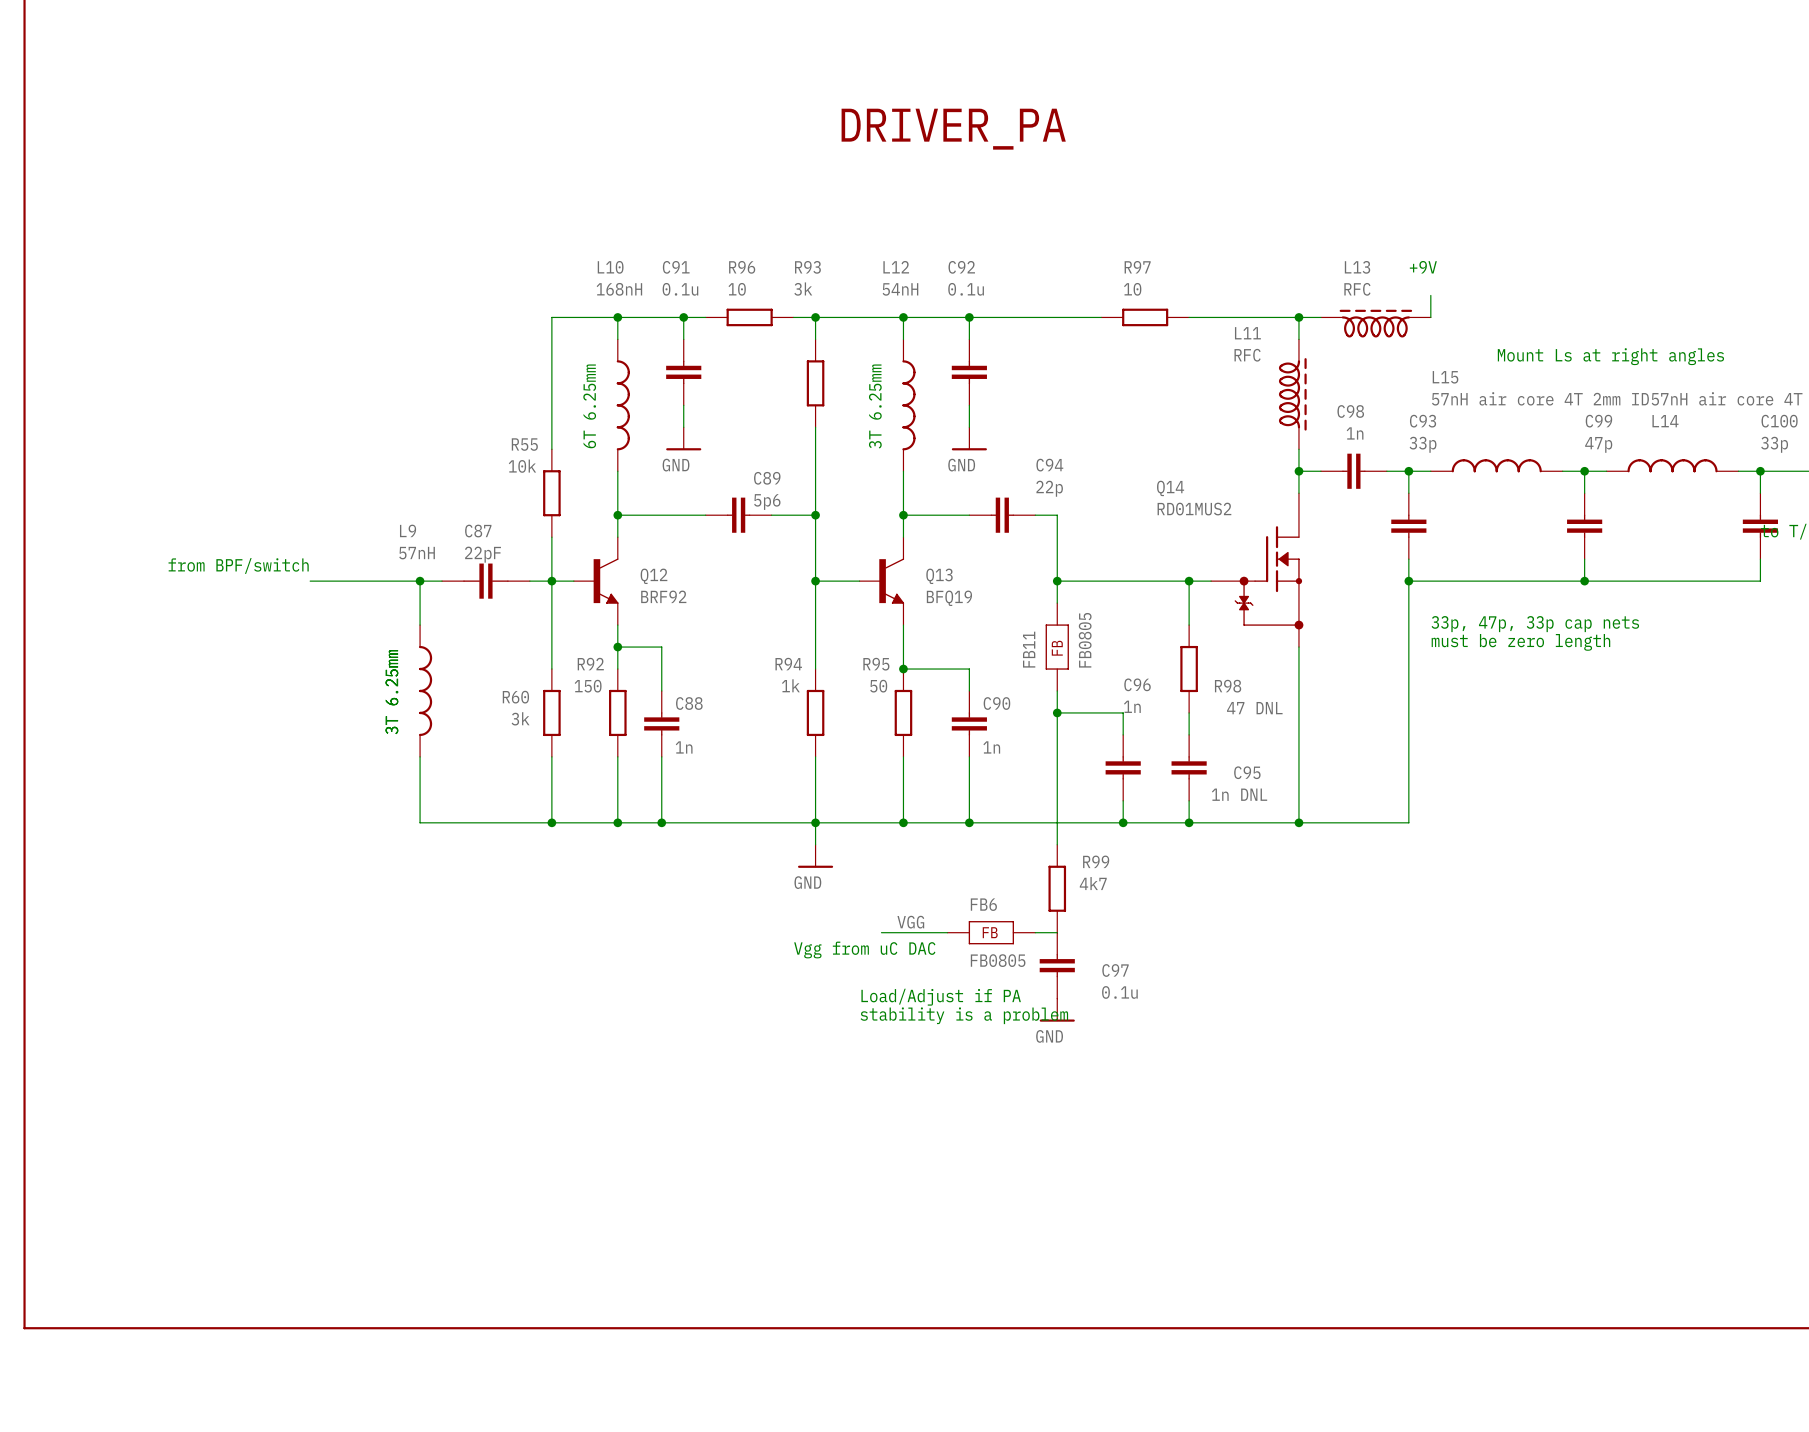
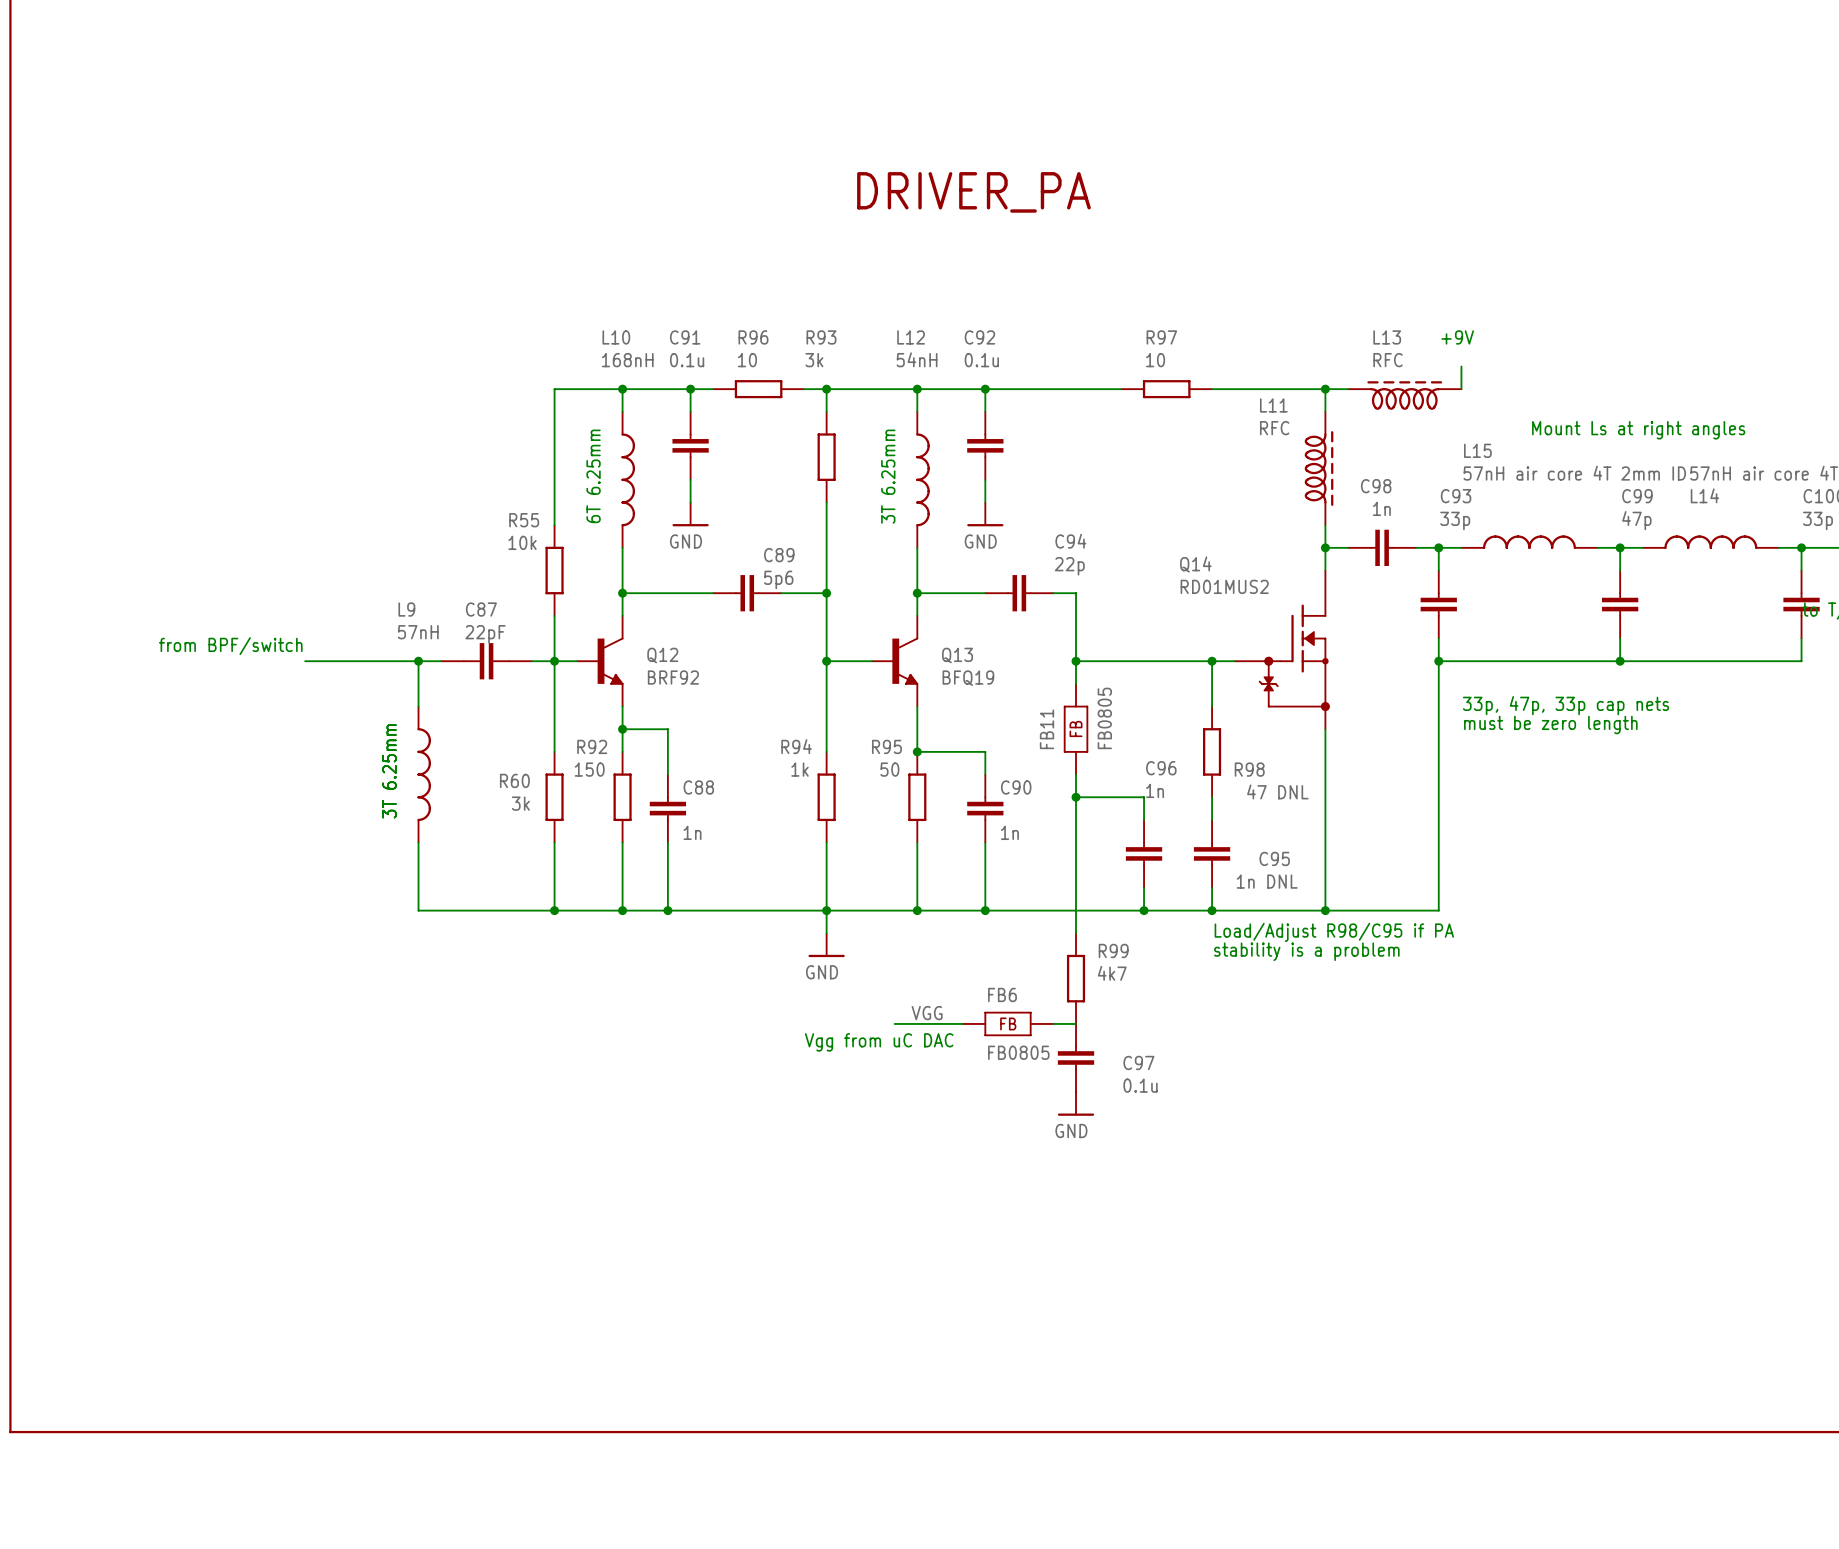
text: none -> Load/Adjust R98/C95 if PA (1334, 932)
text: none -> stability is a problem (1306, 951)
text: Load/Adjust if PA (941, 997) -> none
text: stability is a problem (964, 1015) -> none

